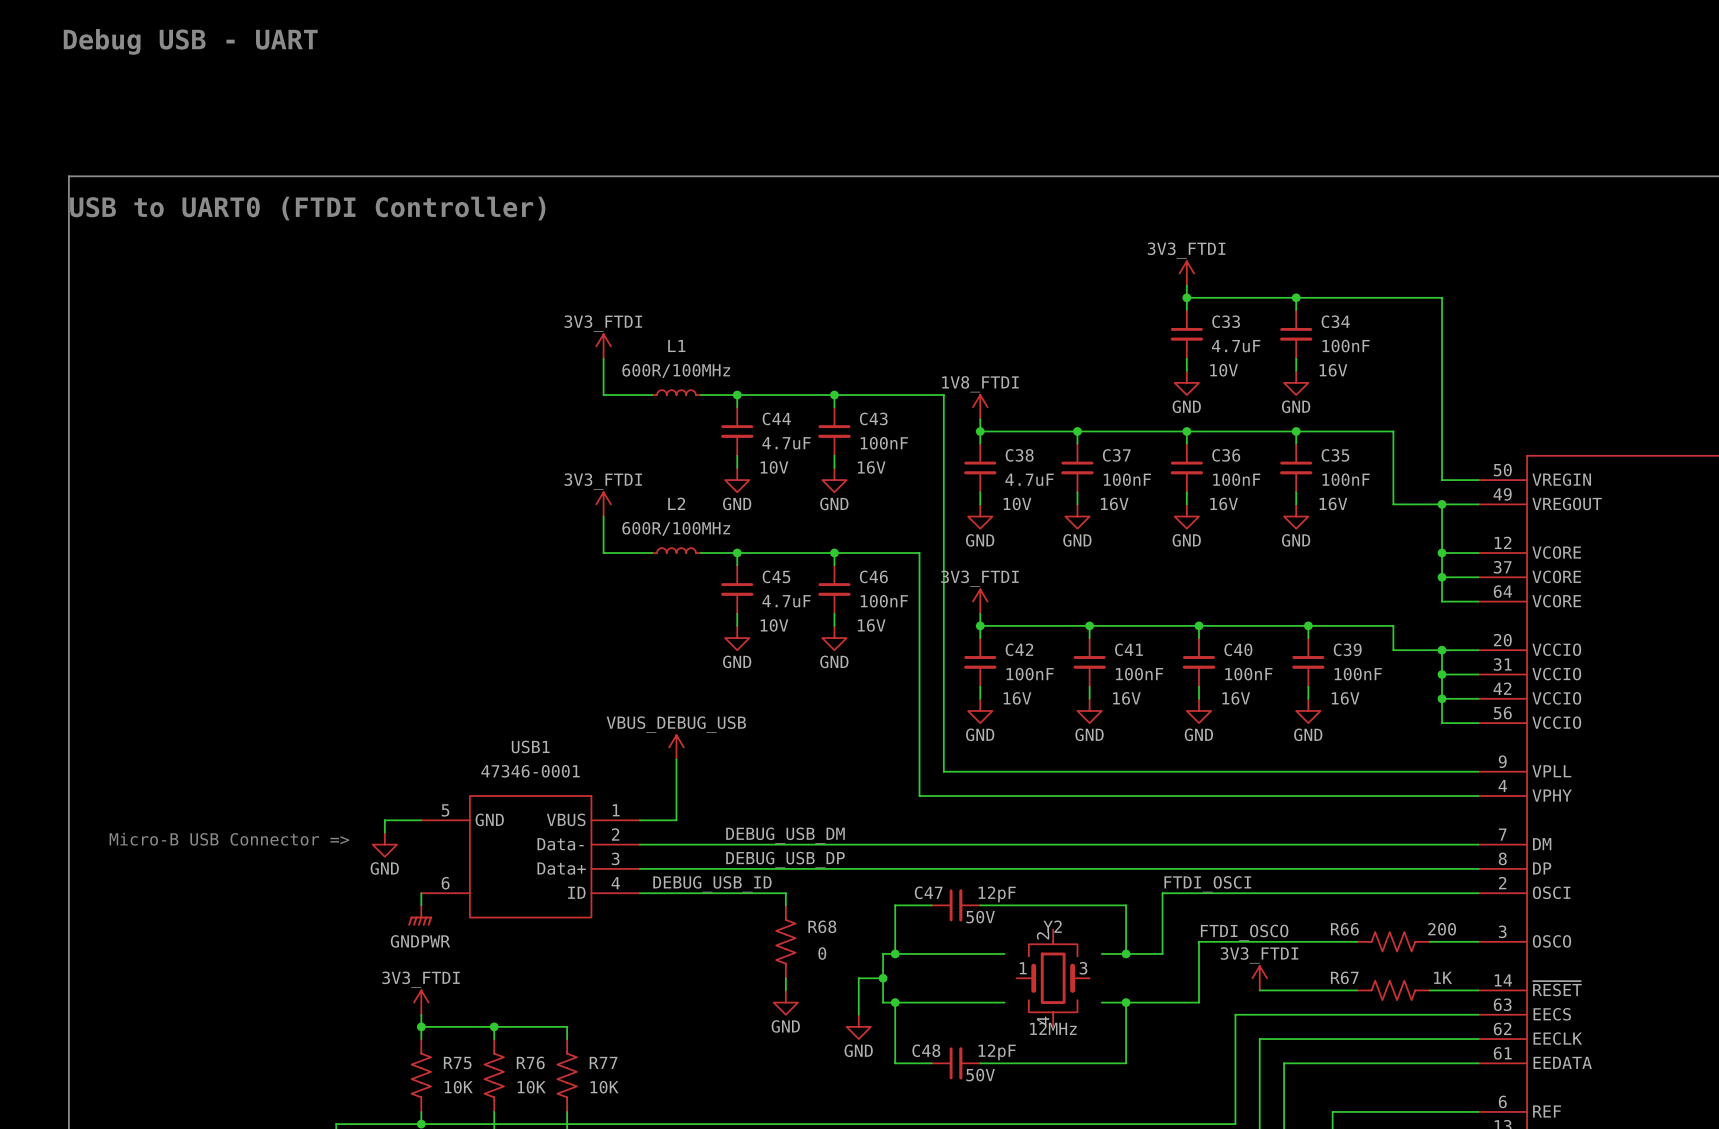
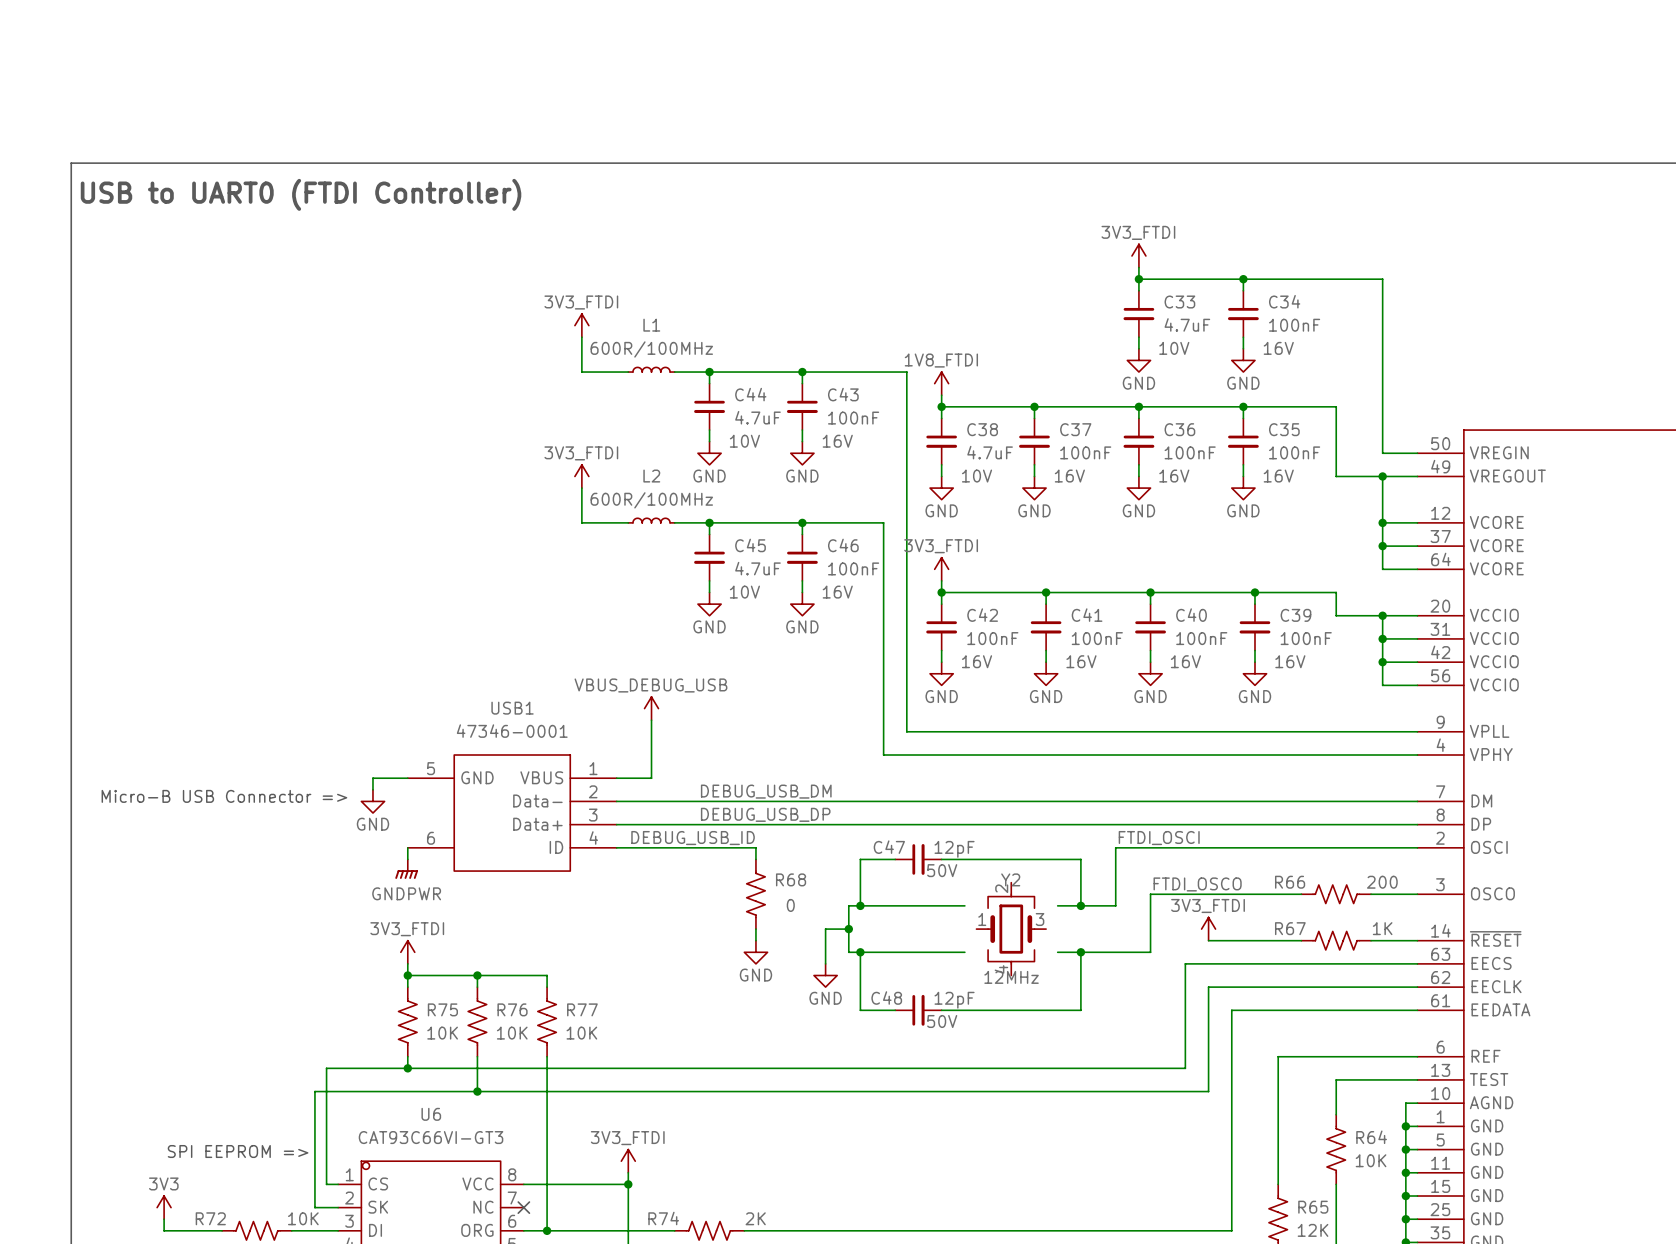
text: Debug USB - UART (190, 41) -> none

